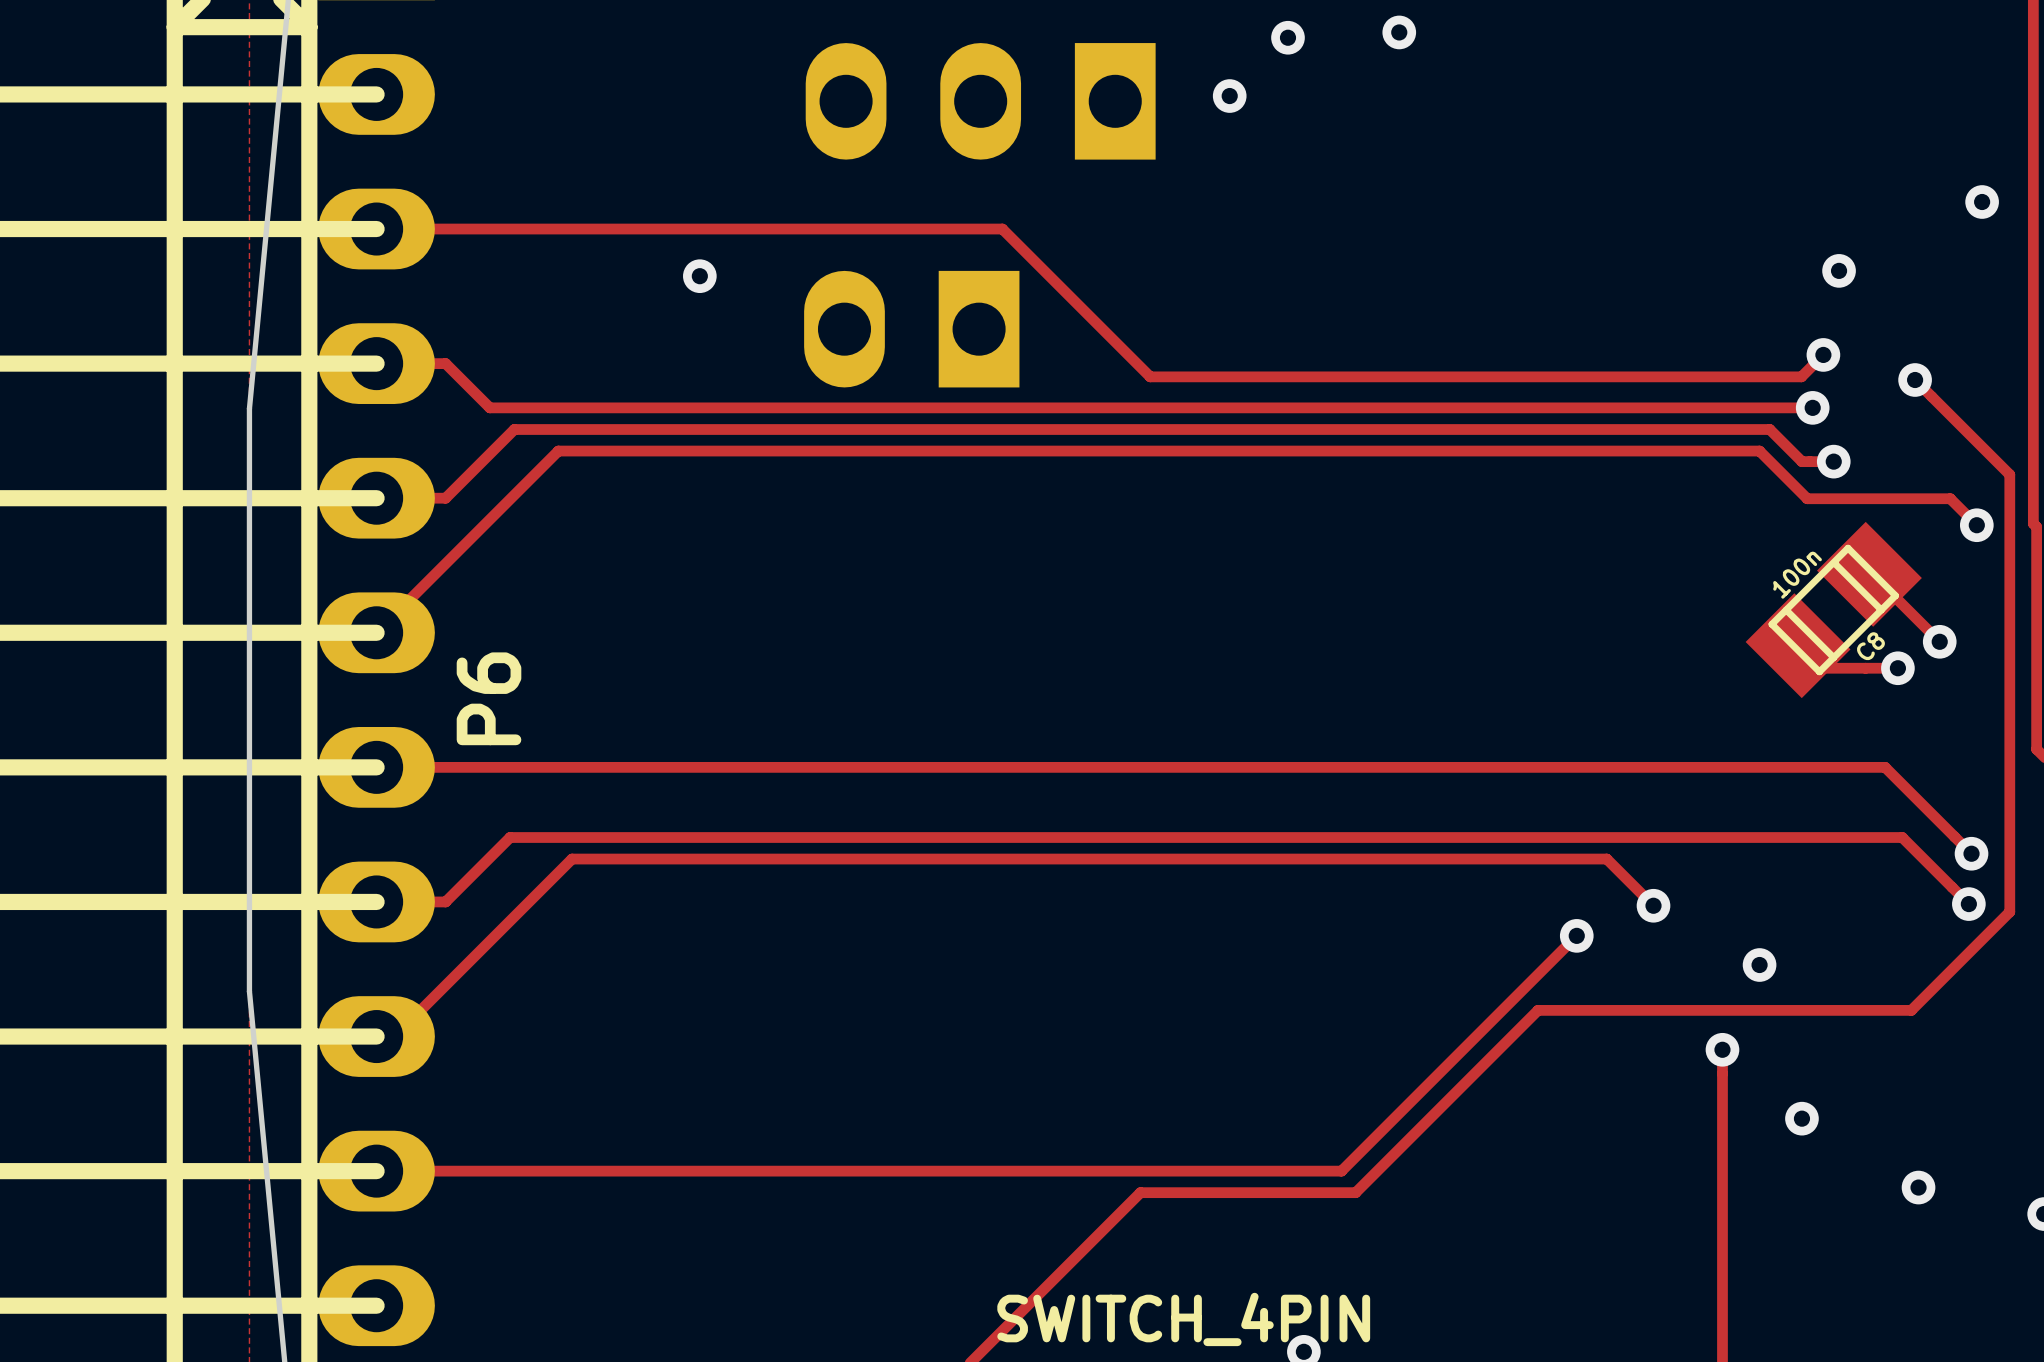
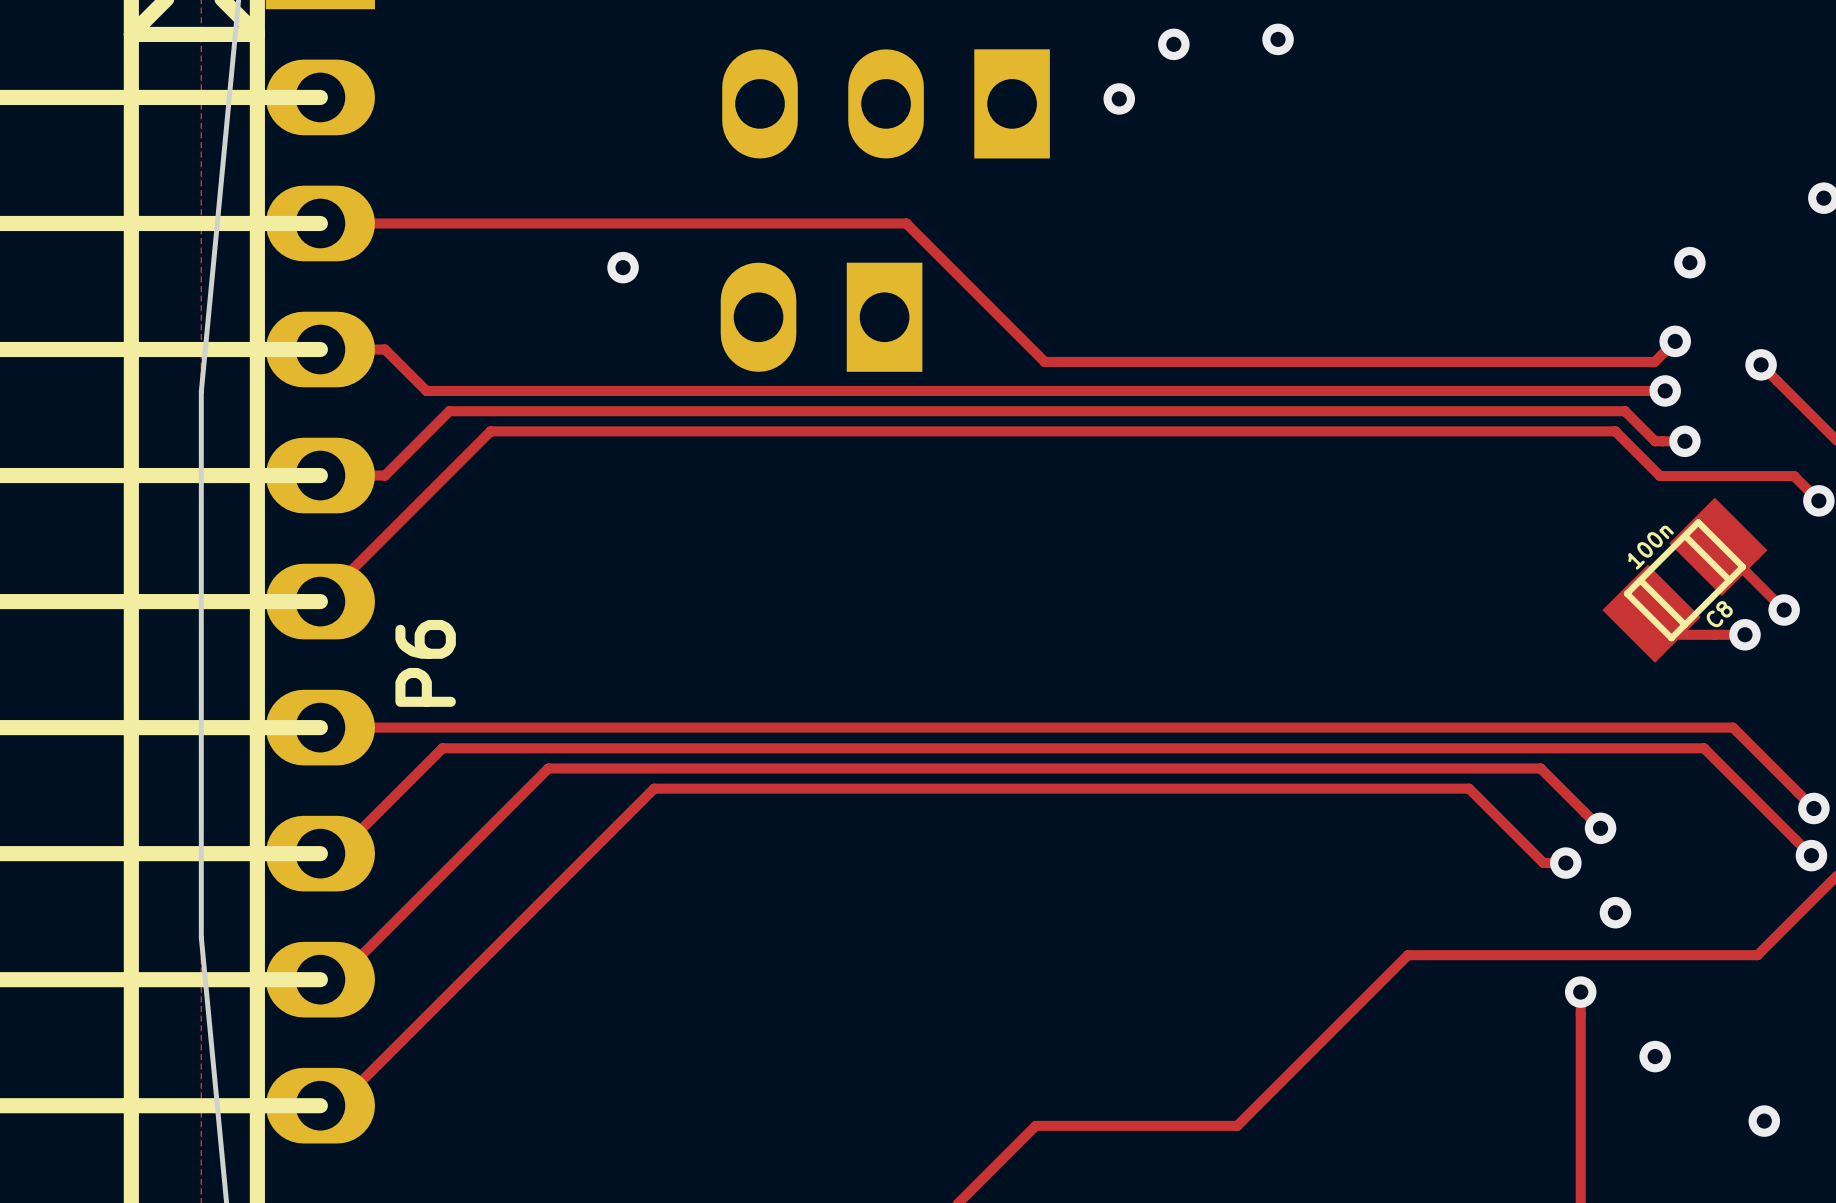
track: (1902, 837) (510, 837) (445, 901) (394, 901) -> (1749, 793) (1704, 748) (442, 748) (337, 853)
track: (572, 859) (1606, 859) (1653, 905) -> (503, 813) (548, 768) (1540, 768) (1600, 828)
via: none -> (1600, 828)
via: (1653, 905) -> none
via: none -> (1565, 863)
track: (1576, 935) (1341, 1171) (394, 1171) -> (1565, 863) (1543, 863) (1469, 788) (654, 788) (337, 1105)
via: (1576, 935) -> none

